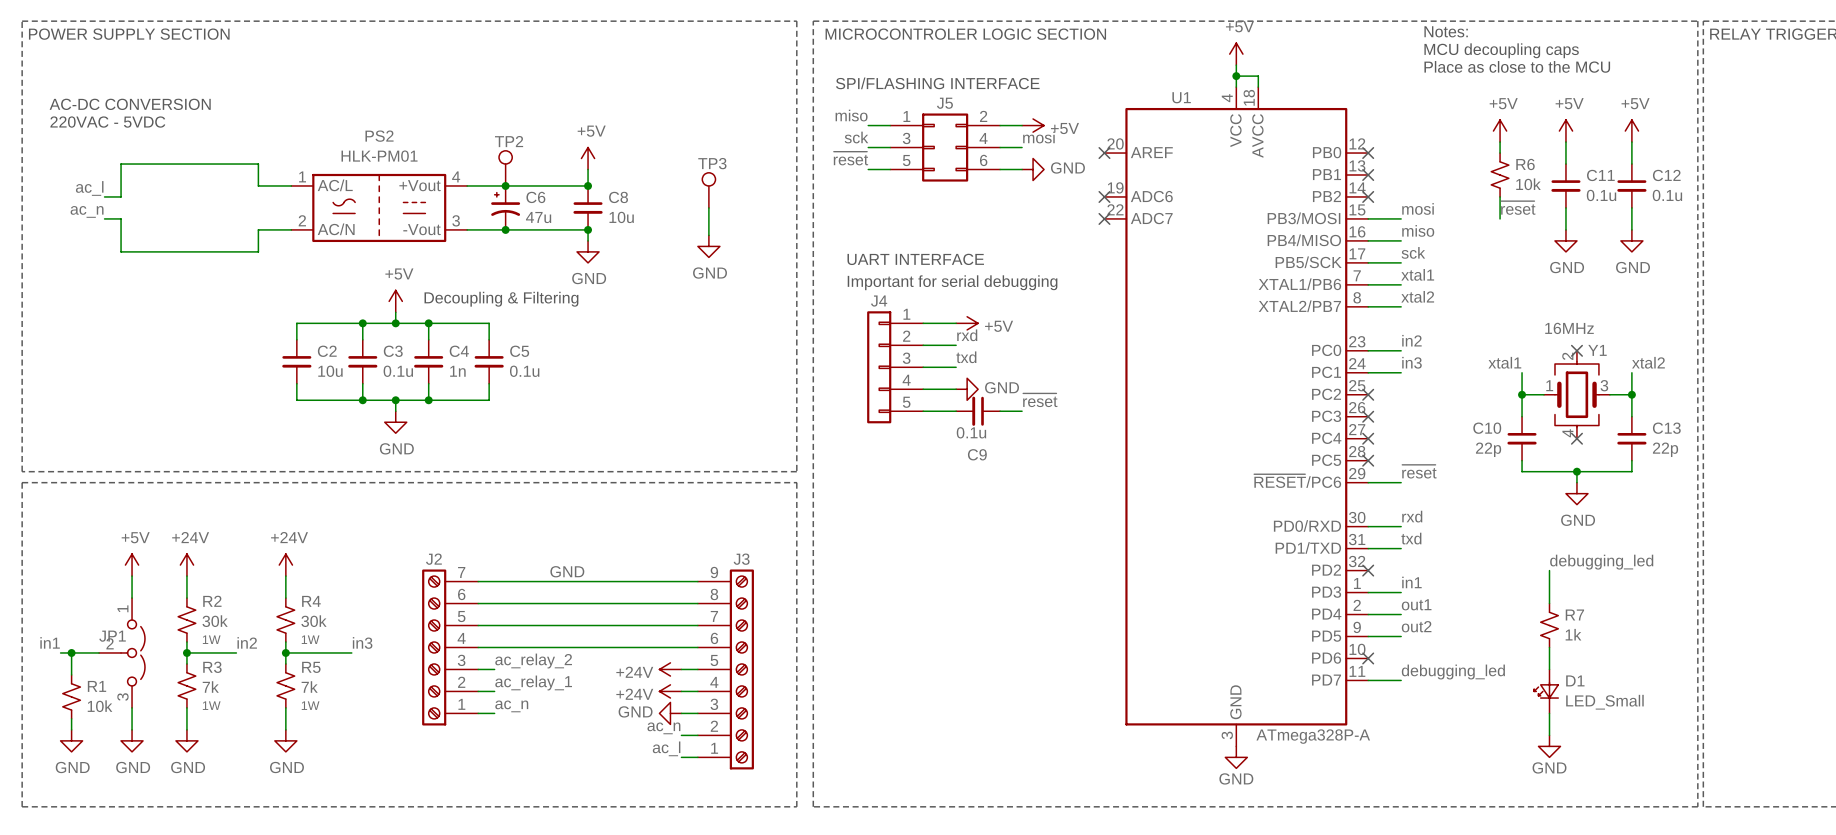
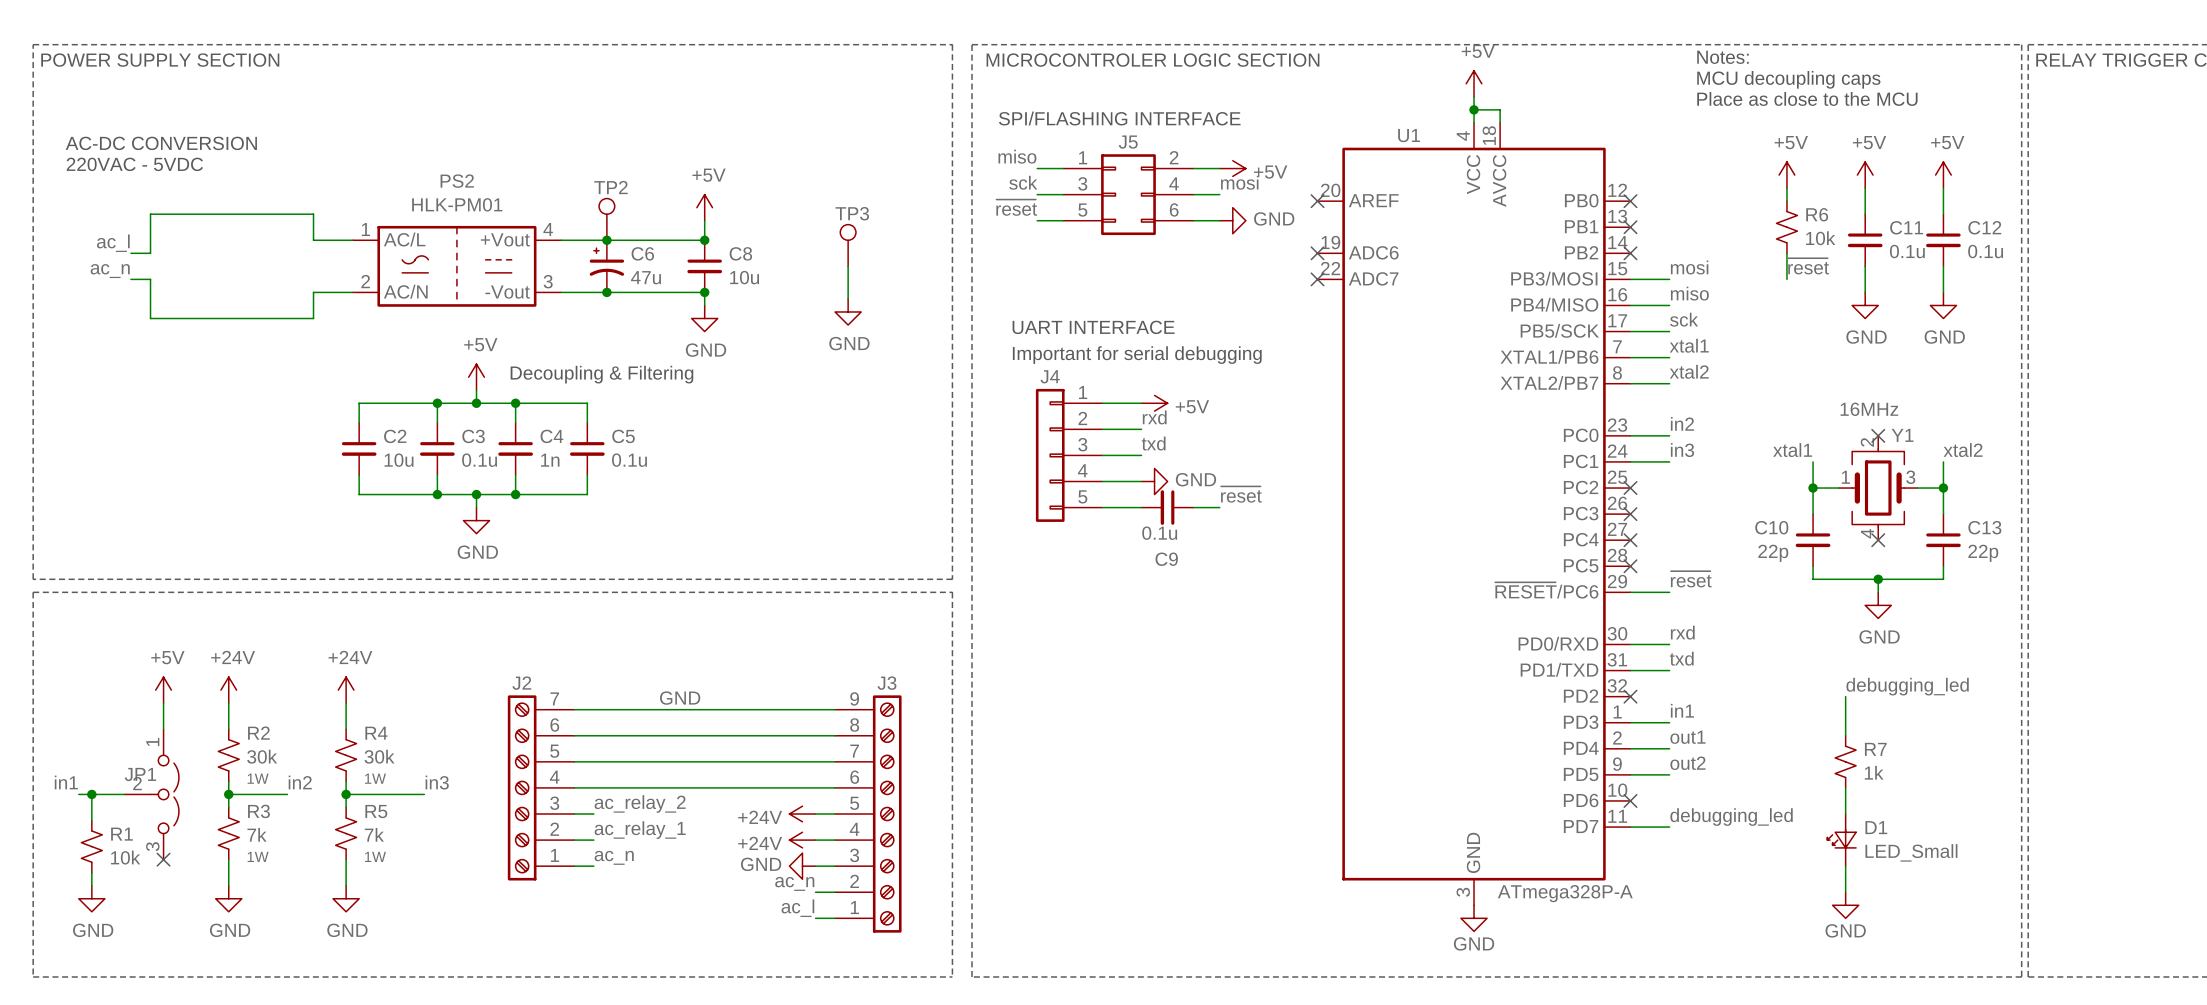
wire: (132, 707) (132, 729) -> none
no-connect mark: none -> (163, 859)
power symbol: GND (132, 740) -> none

